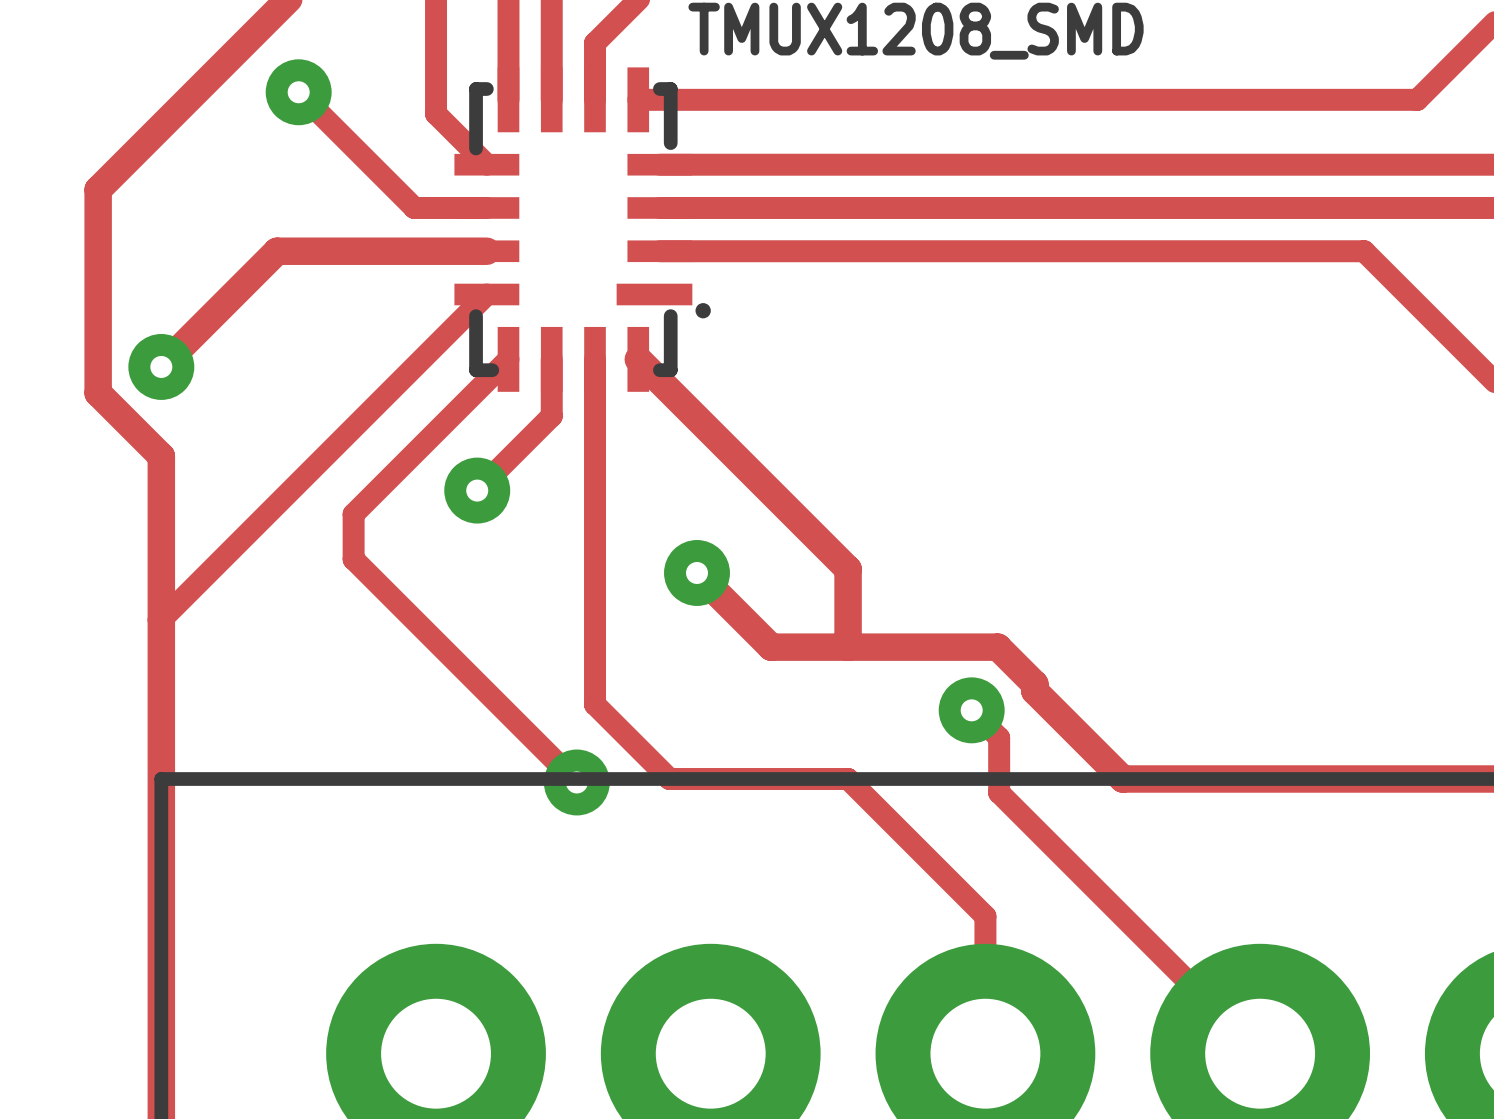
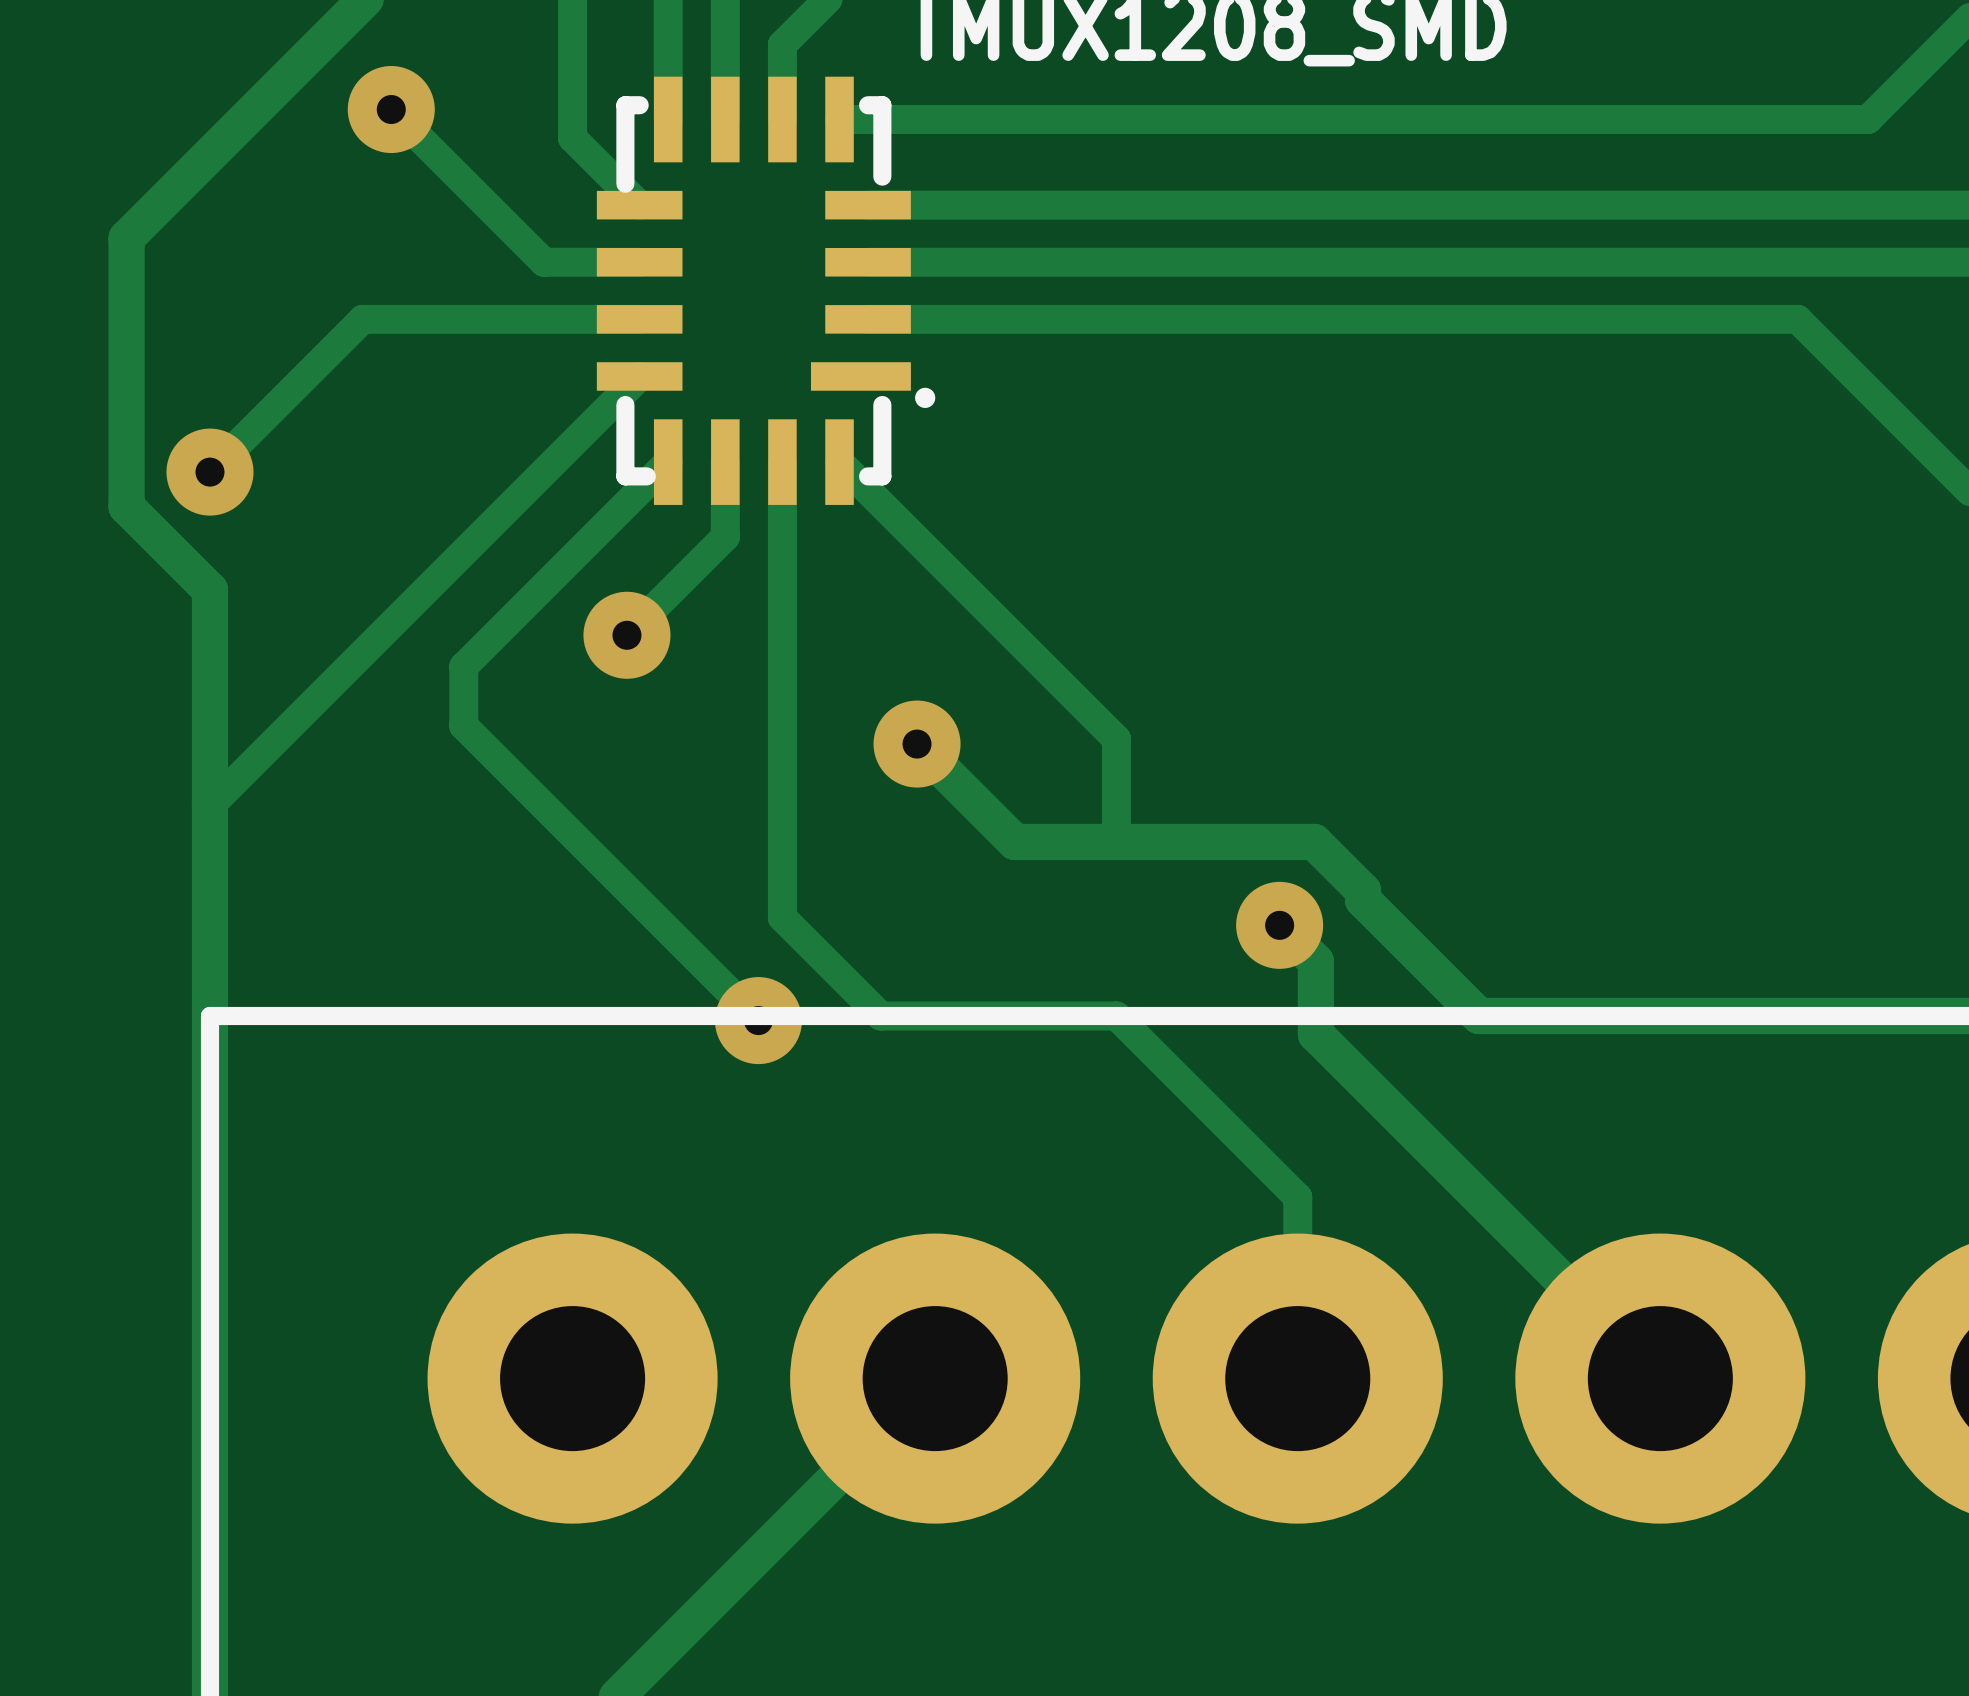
track width: thick (486, 251) (277, 251) (161, 366) -> thin (639, 319) (362, 319) (209, 472)
track width: thick (638, 359) (848, 569) (848, 647) -> thin (839, 462) (1116, 739) (1116, 841)
track width: thin (971, 710) (999, 737) (999, 792) (1260, 1053) -> thick (1279, 925) (1315, 961) (1315, 1034) (1660, 1378)

